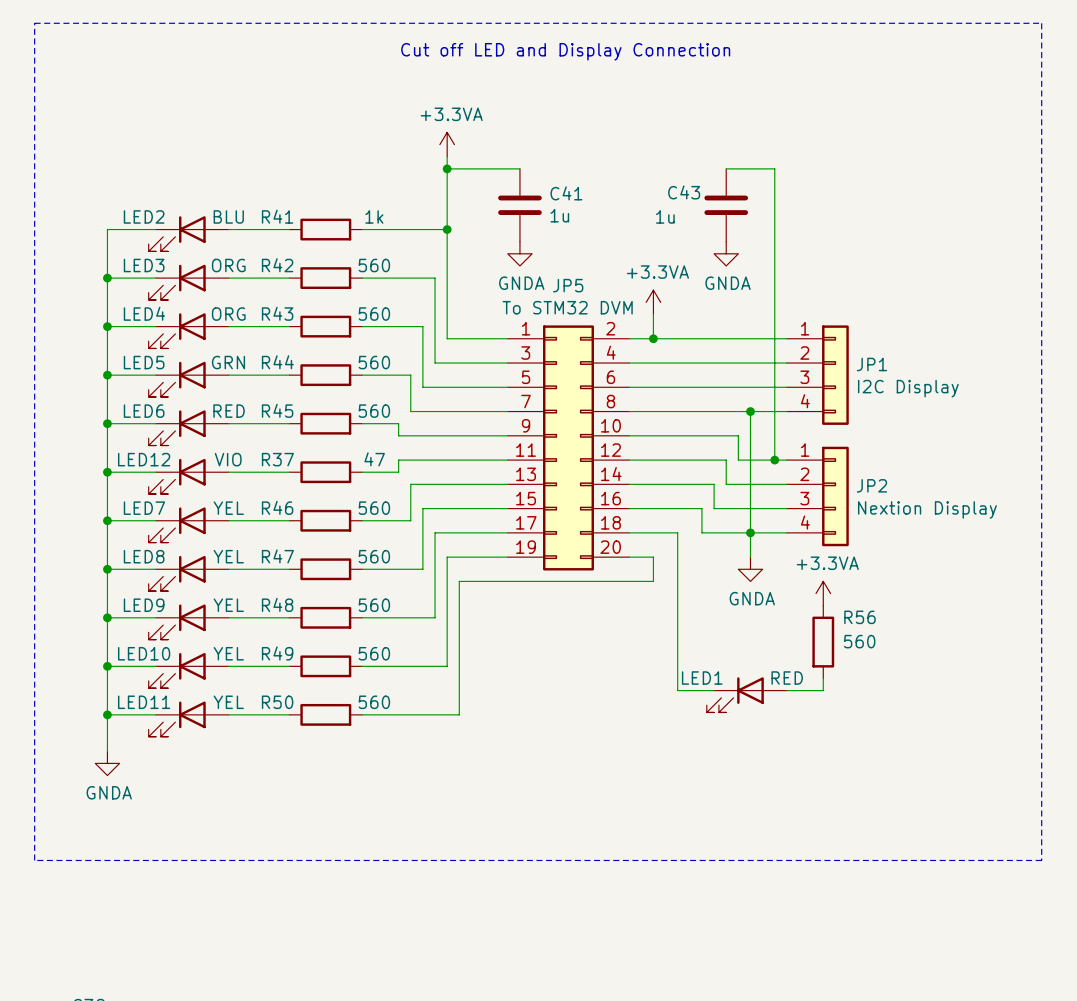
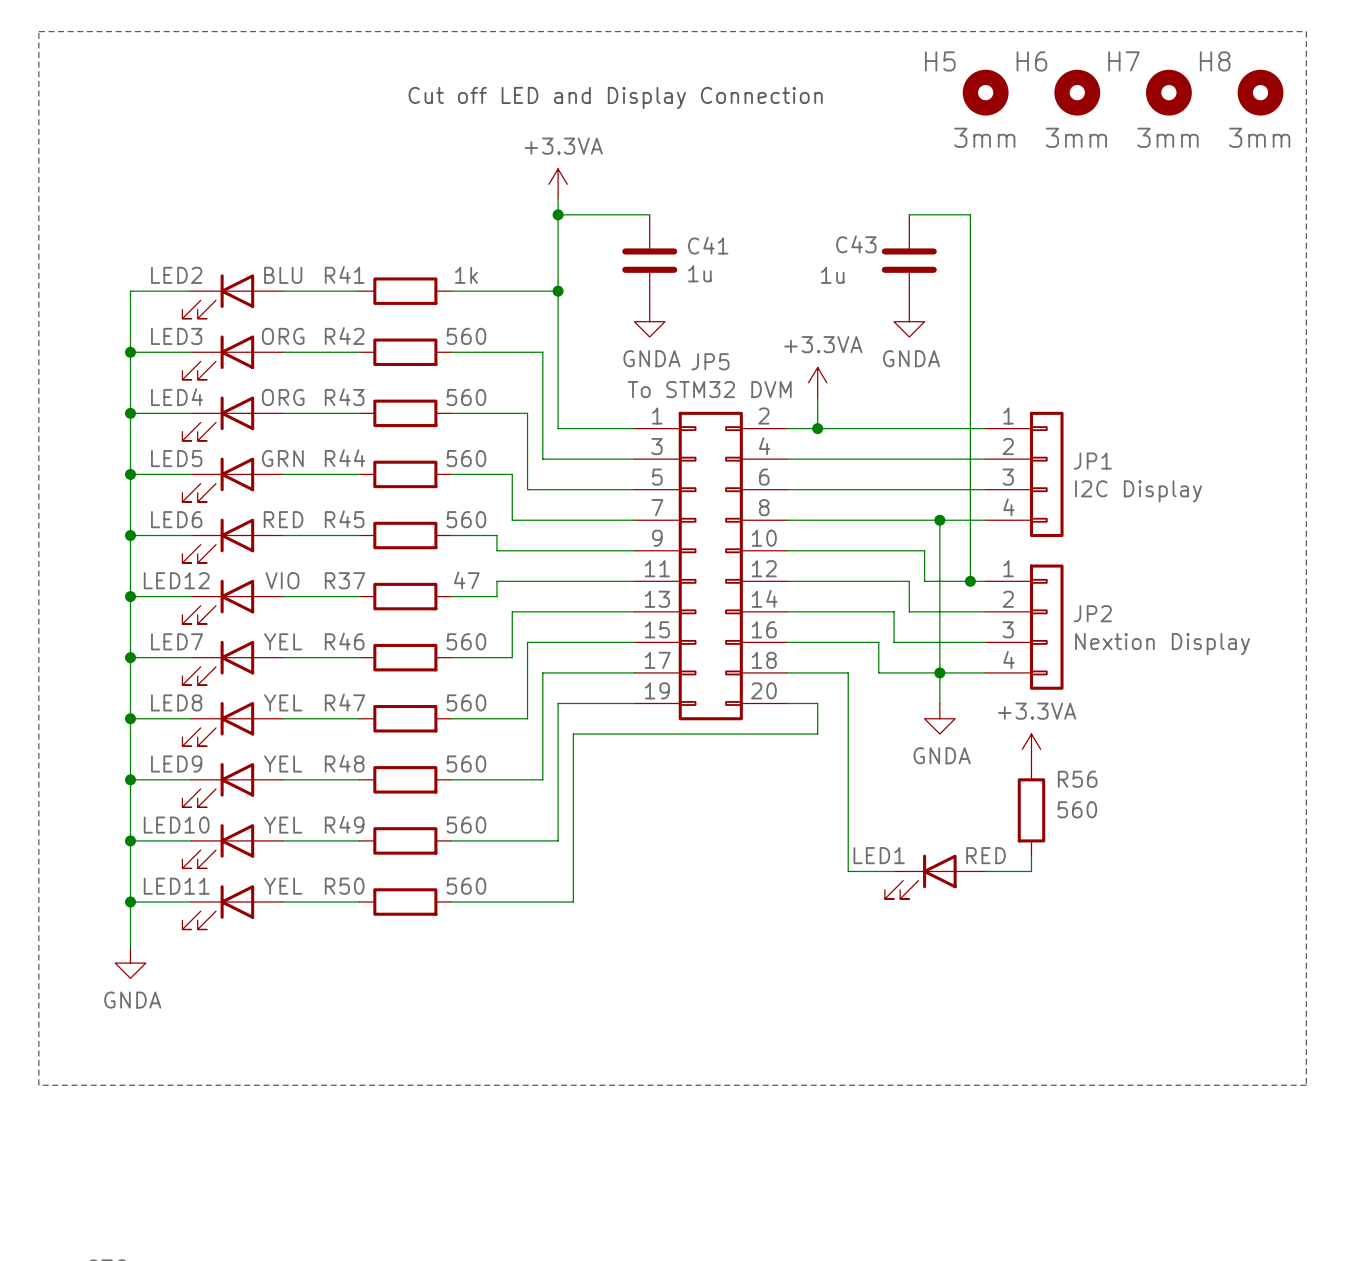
text position: Cut off LED and Display Connection (565, 51) -> Cut off LED and Display Connection (615, 97)
H5: none -> 3mm (985, 92)
H6: none -> 3mm (1077, 92)
H7: none -> 3mm (1168, 92)
H8: none -> 3mm (1260, 92)

